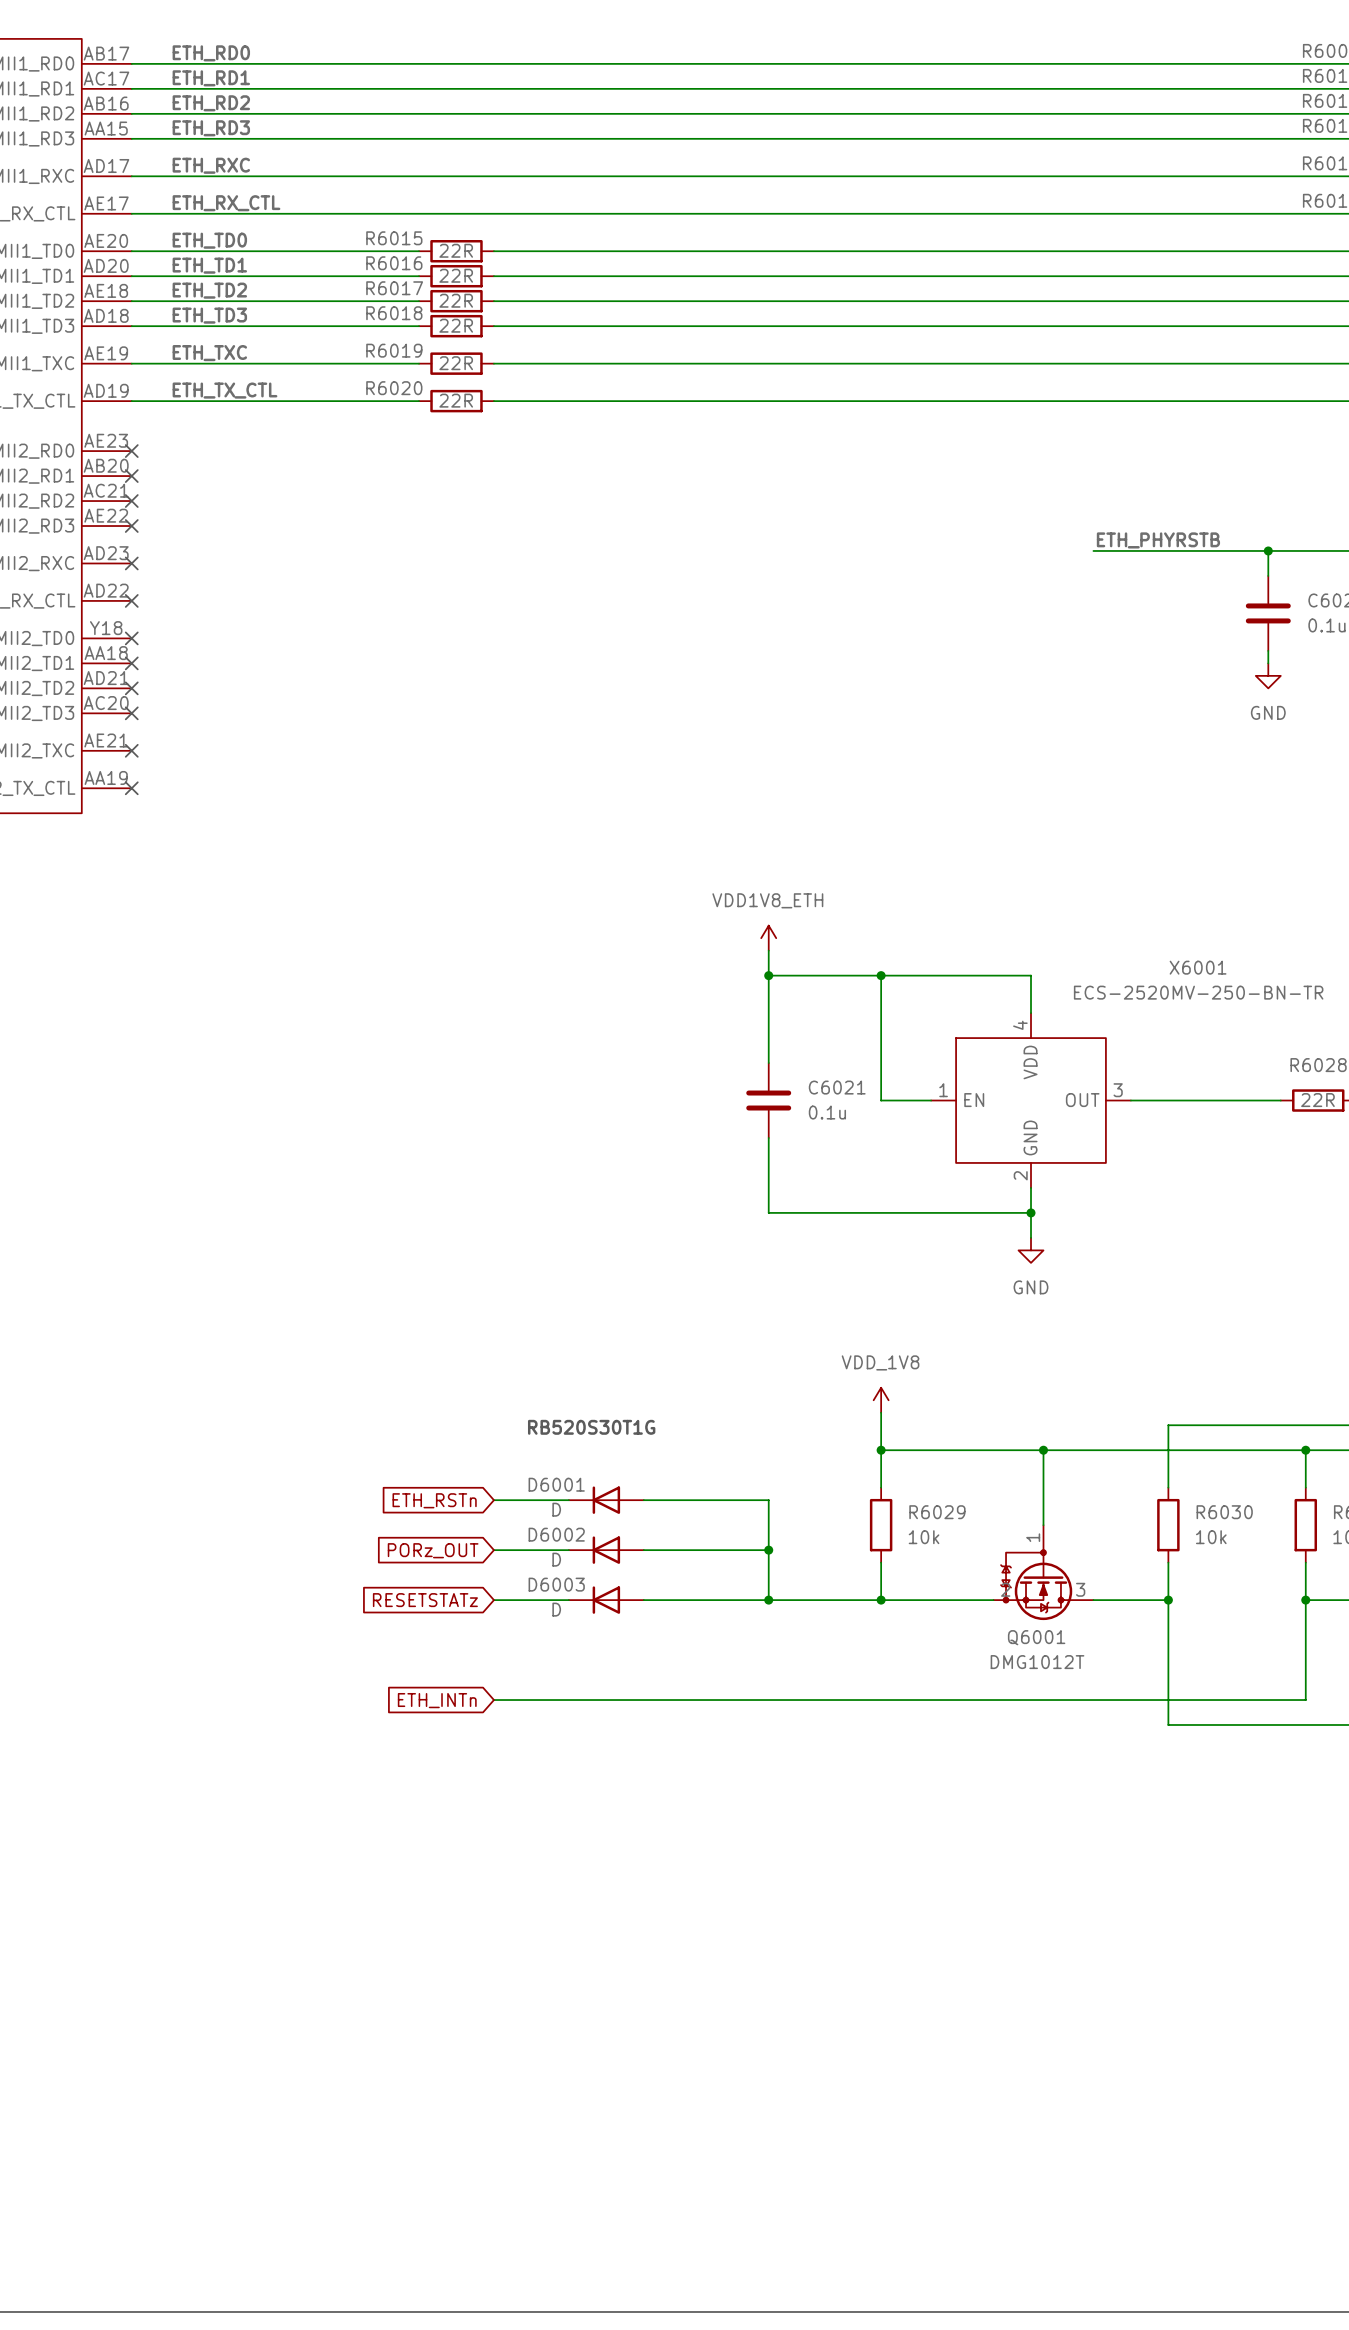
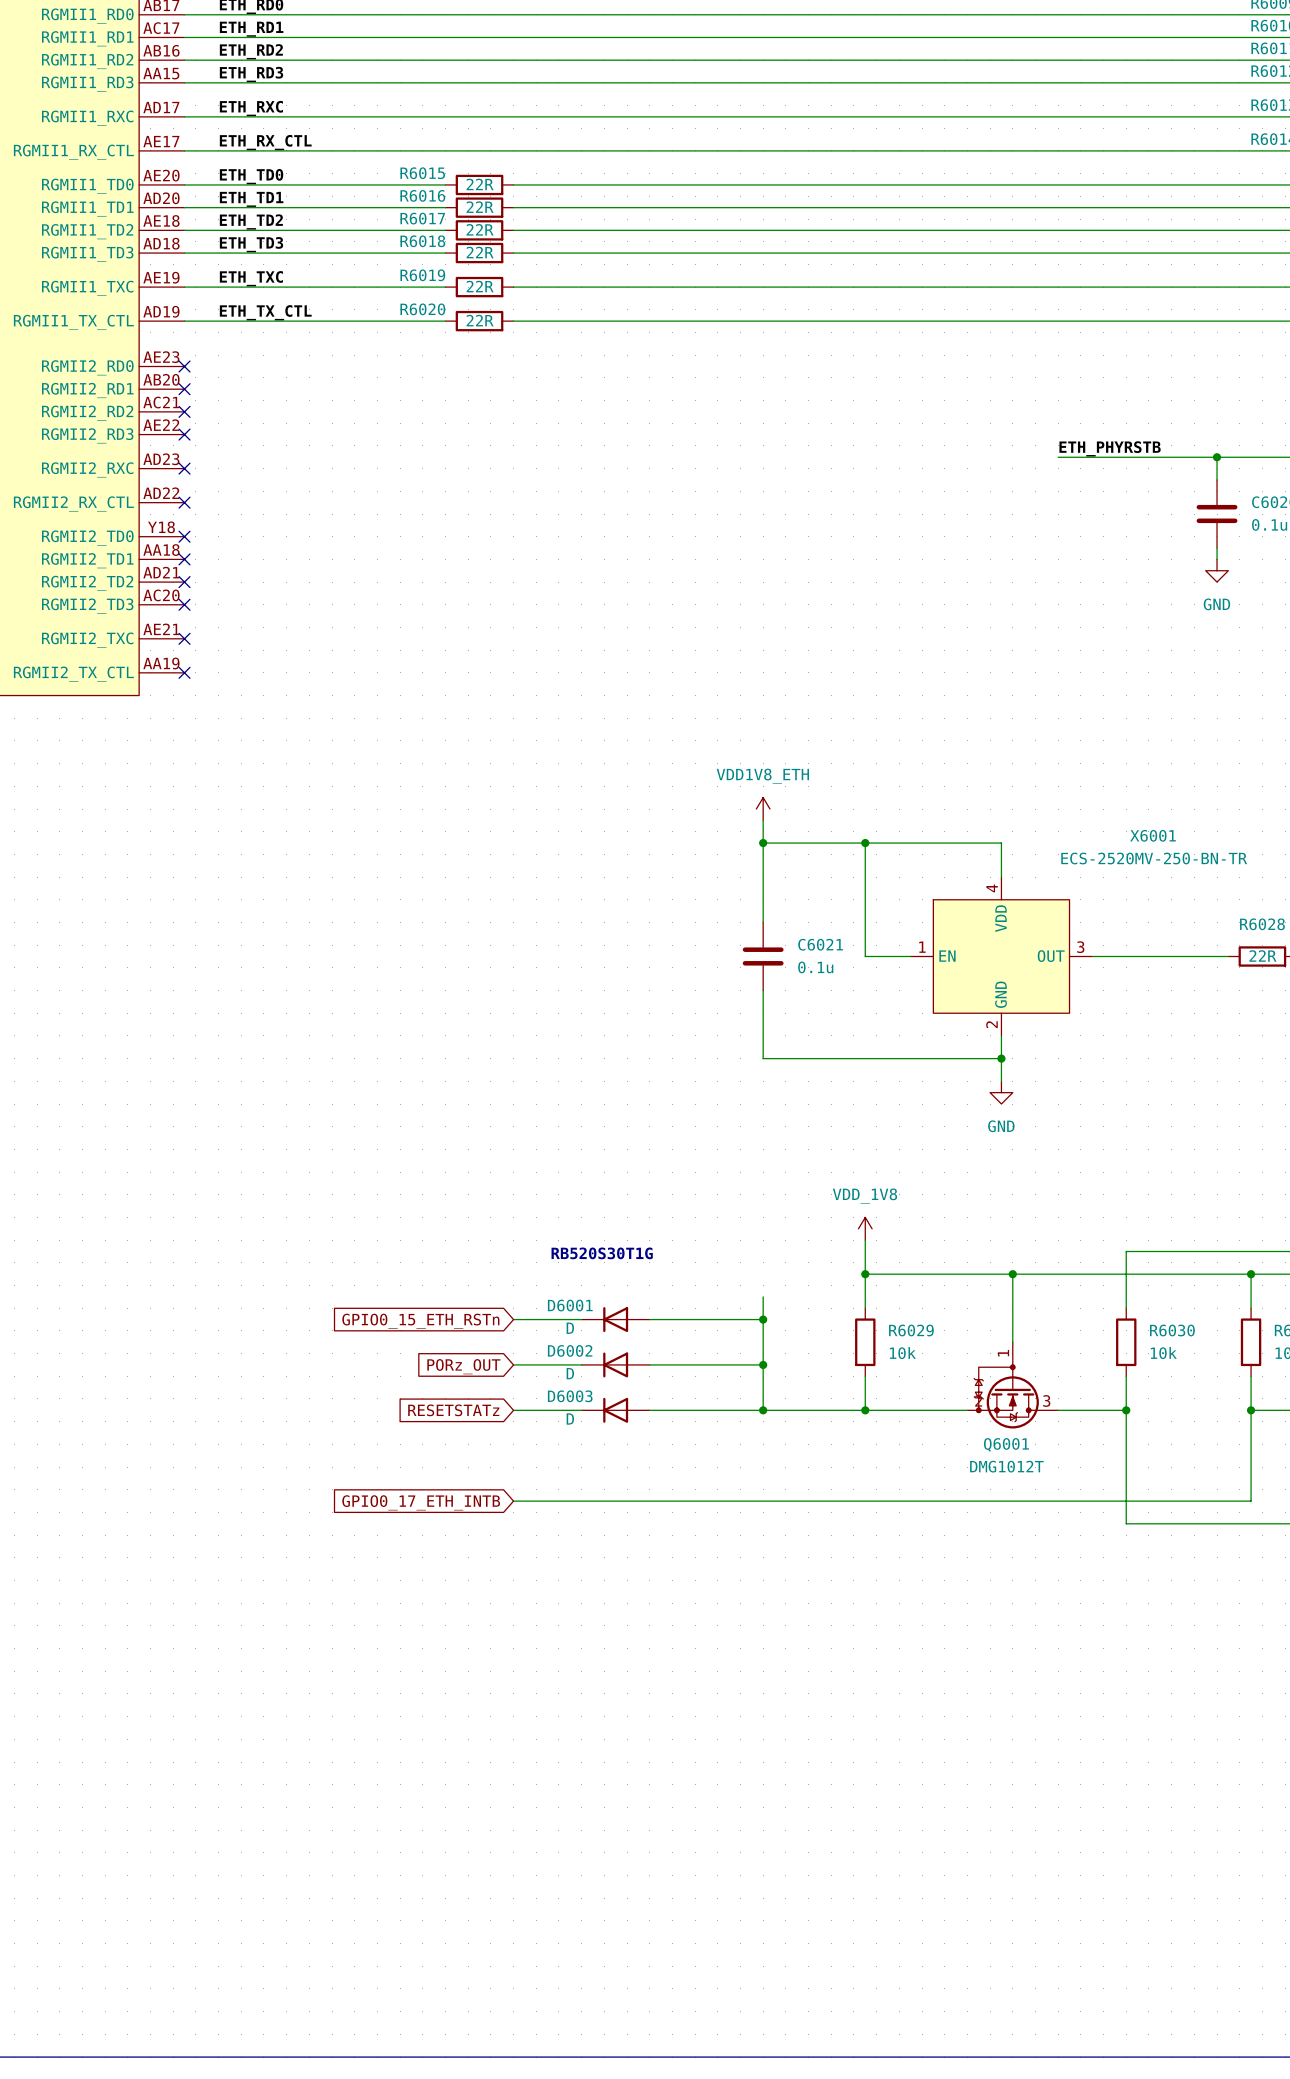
wire: none -> (763, 1296) (763, 1319)
global label: ETH_RSTn (434, 1500) -> GPIO0_15_ETH_RSTn (420, 1321)
junction: none -> (763, 1319)
global label: ETH_INTn (437, 1700) -> GPIO0_17_ETH_INTB (421, 1502)

